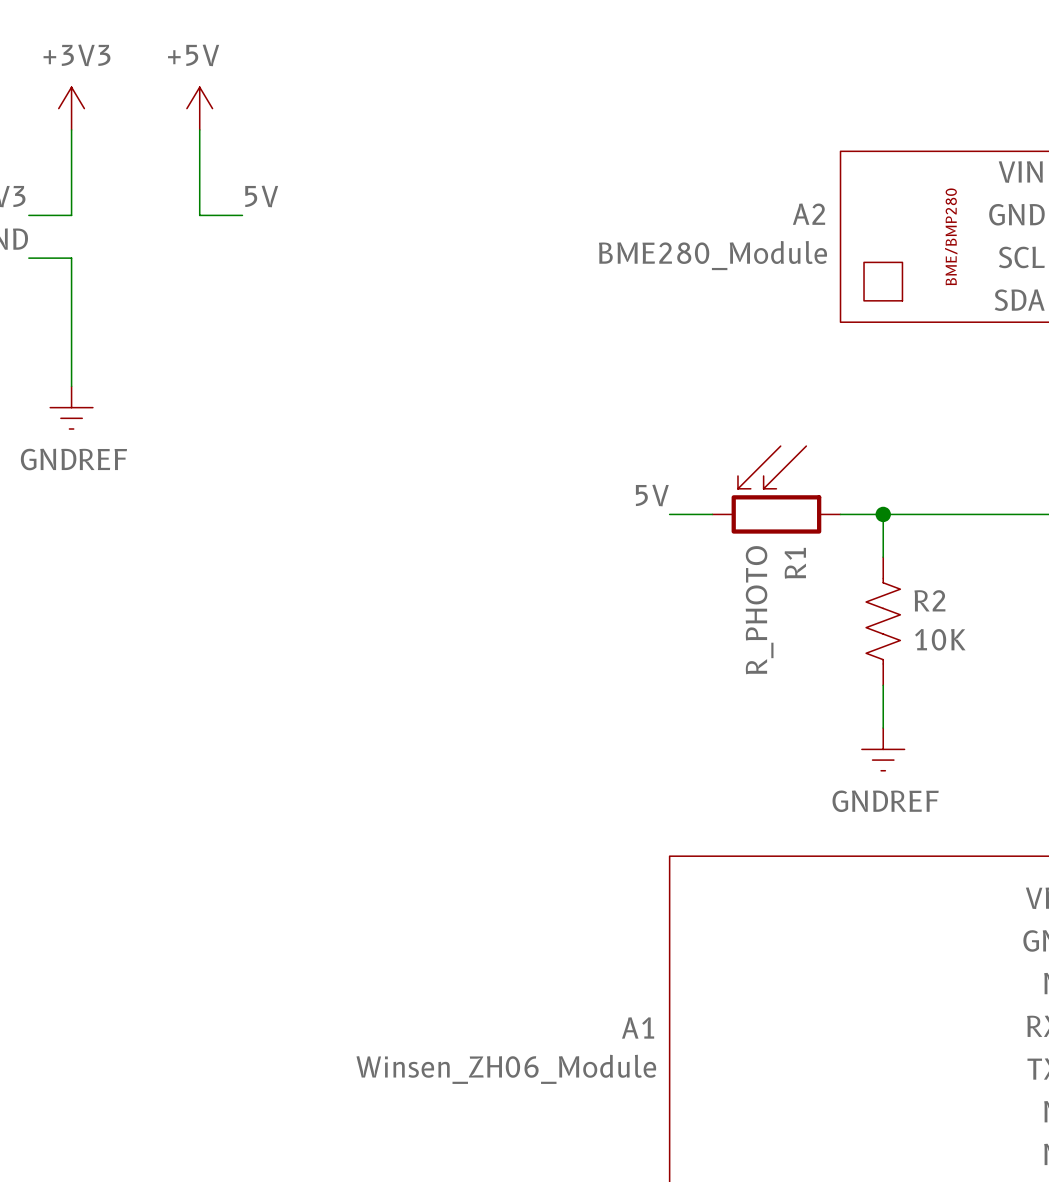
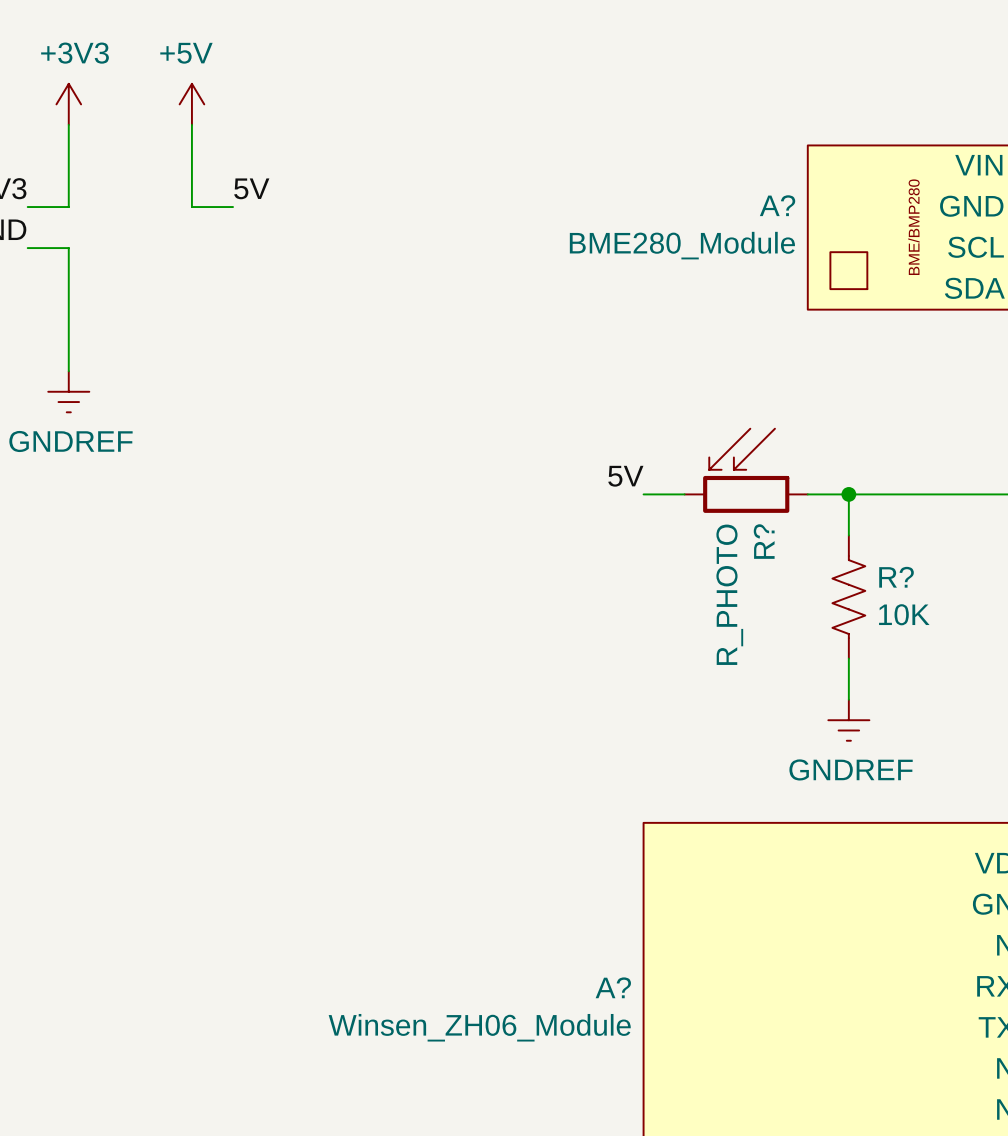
A2 name: A2 (809, 214) -> A? (777, 205)
R1 name: R1 (795, 563) -> R? (764, 541)
R2 name: R2 (929, 600) -> R? (896, 577)
A1 name: A1 (638, 1027) -> A? (613, 987)

